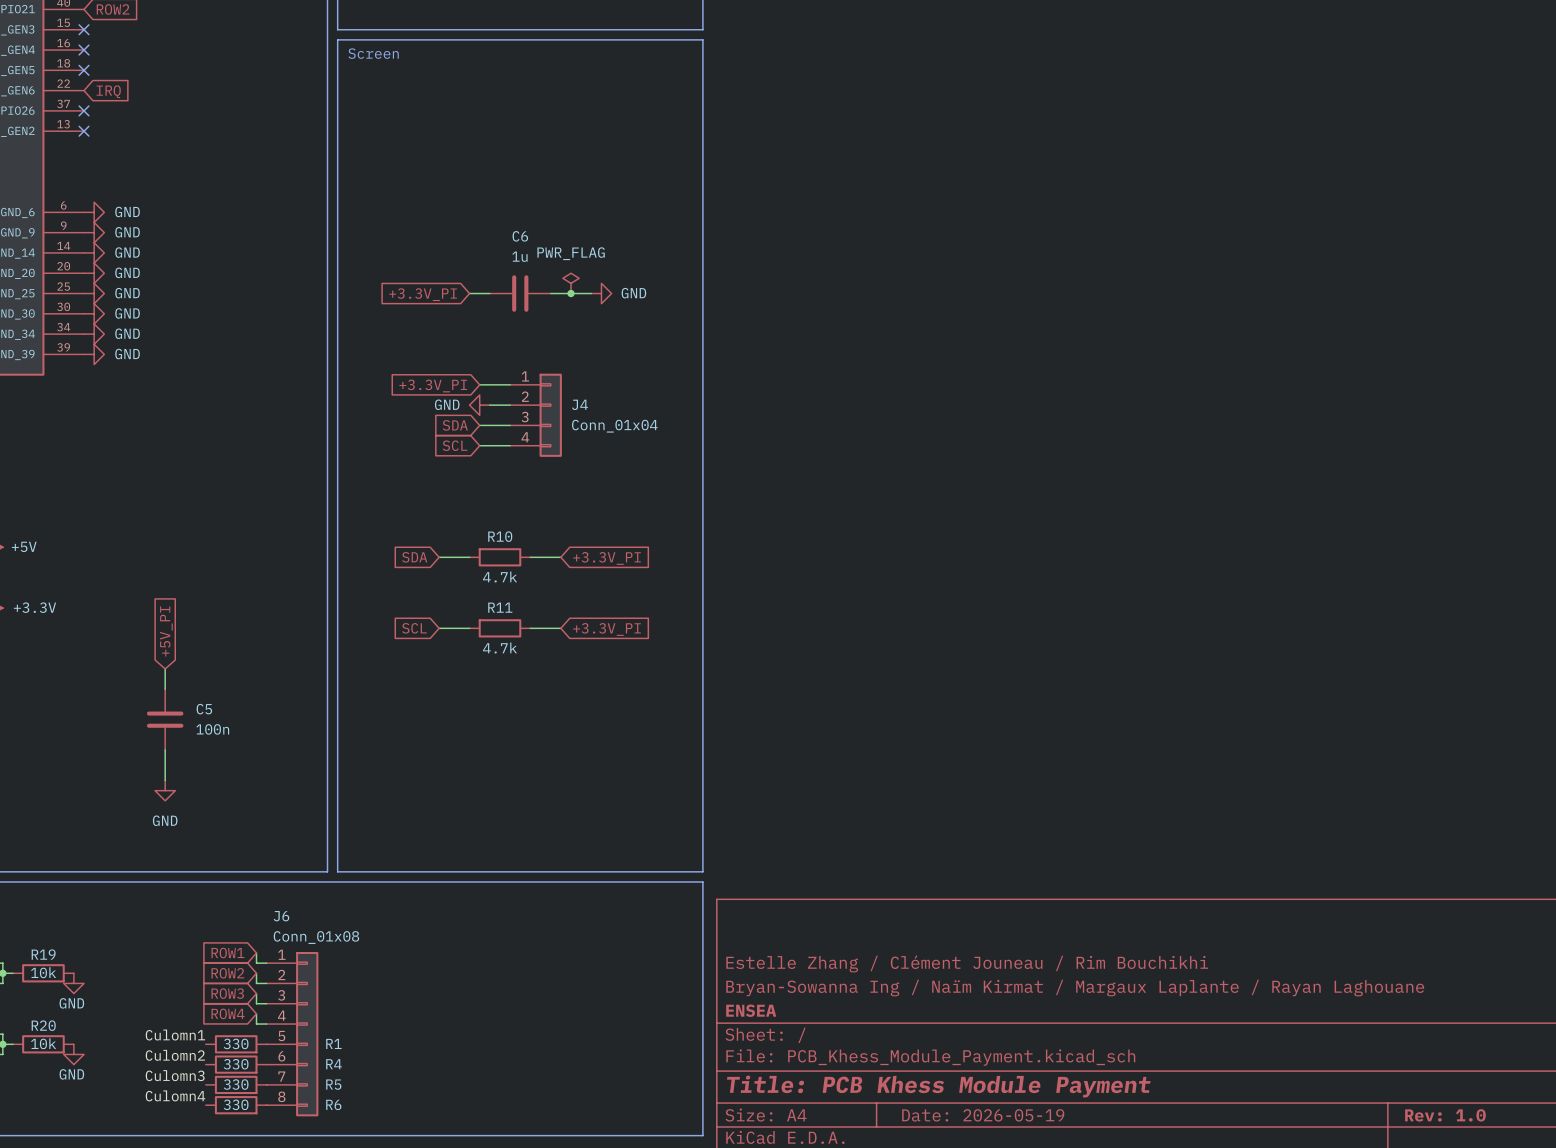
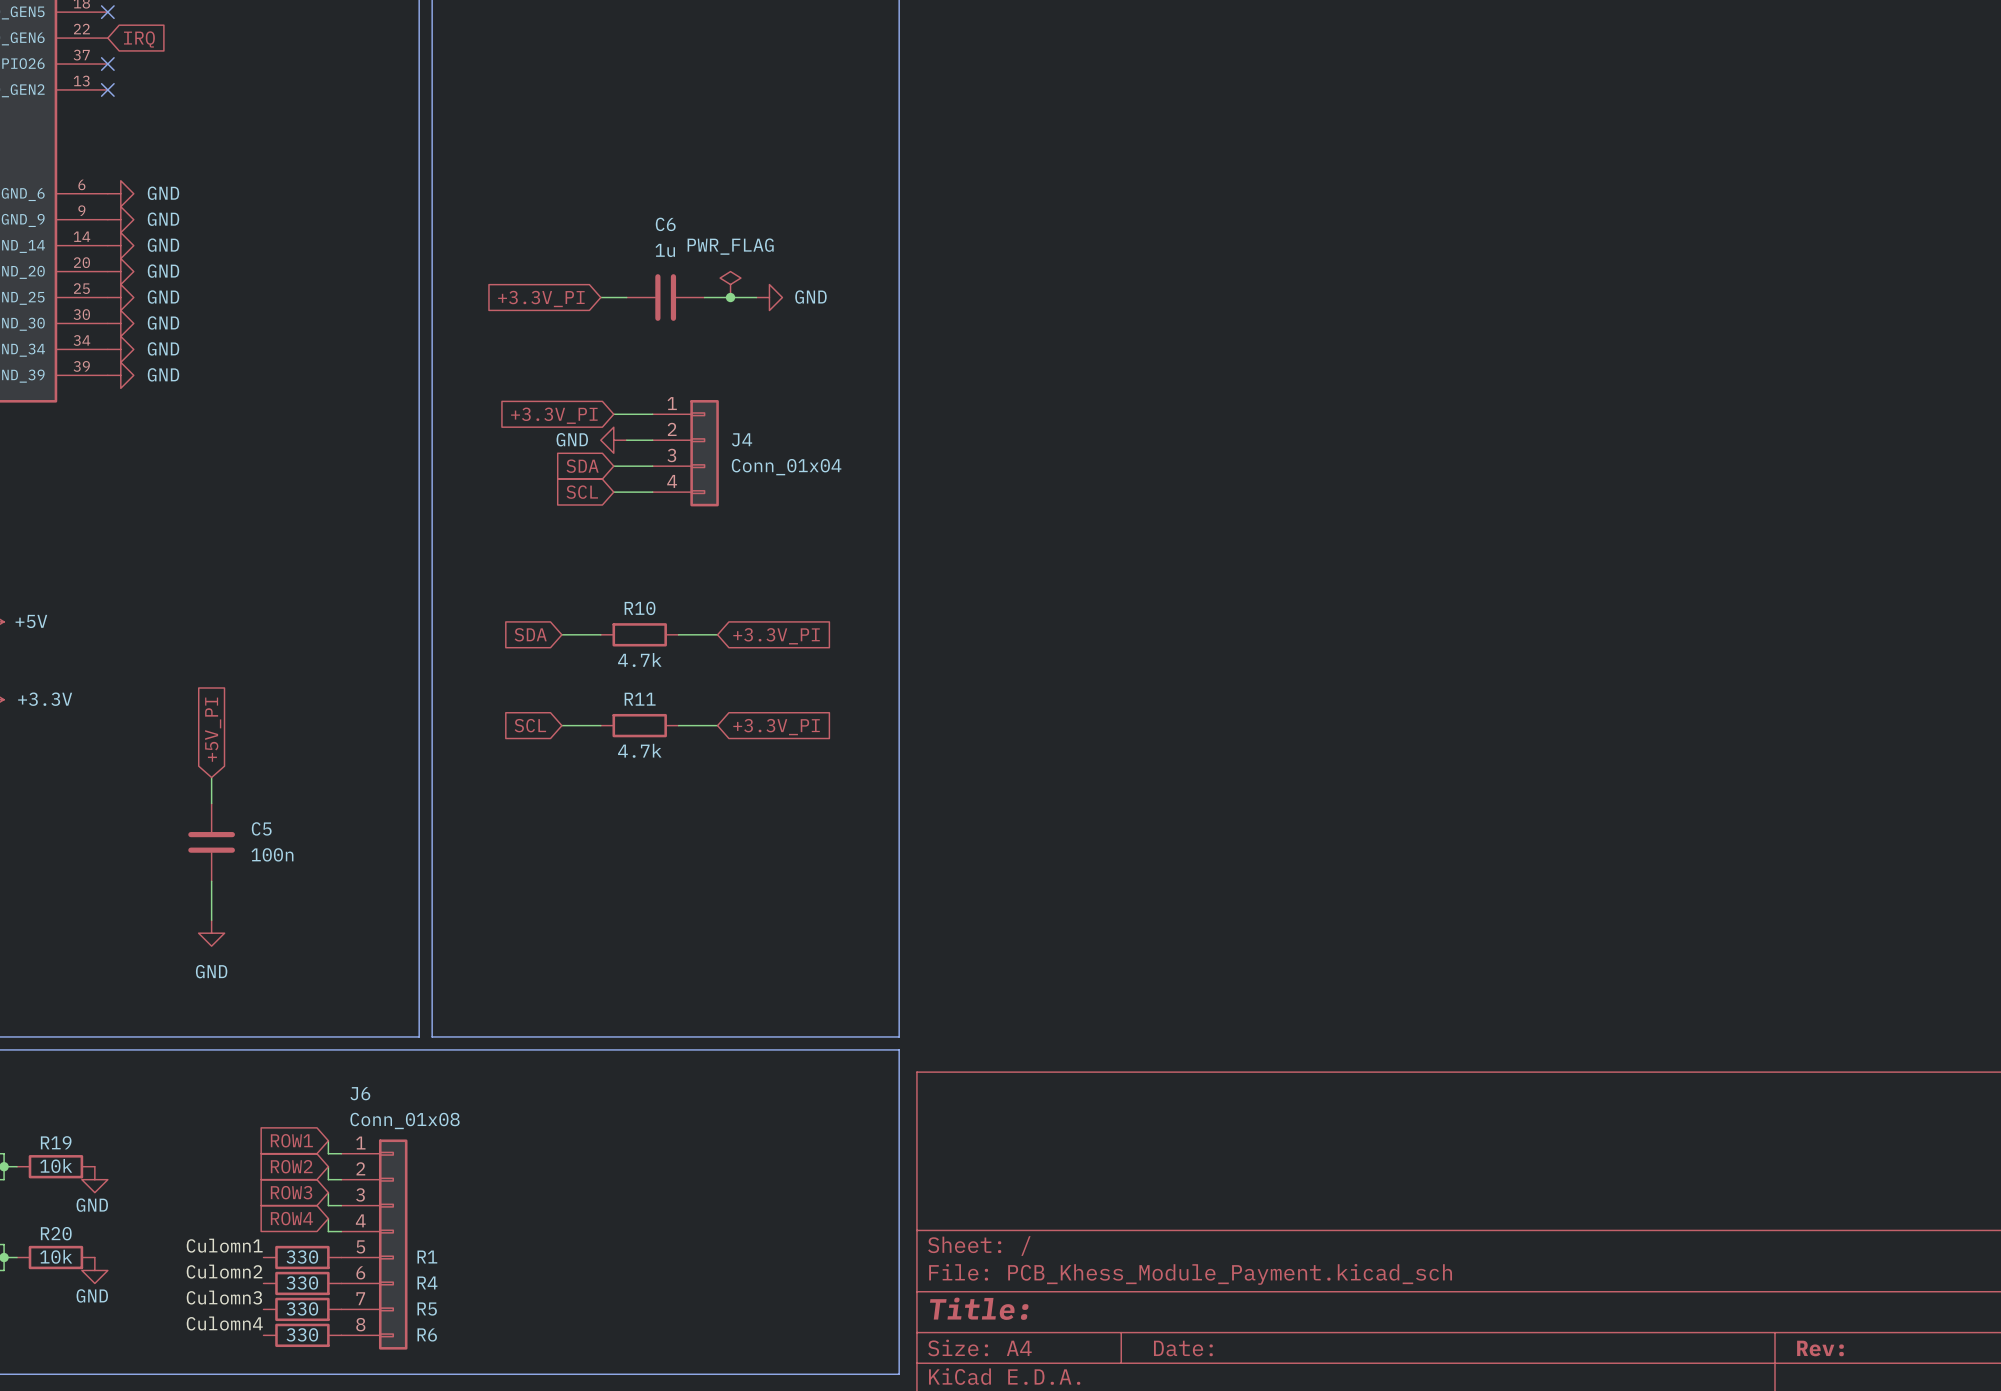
title block: Estelle Zhang / Clément Jouneau / Rim Bouchikhi (967, 963) -> none
title block: Bryan-Sowanna Ing / Naïm Kirmat / Margaux Laplante / Rayan Laghouane (1075, 988) -> none
title block: ENSEA (751, 1010) -> none
title block: Title: PCB Khess Module Payment (938, 1086) -> Title: (979, 1308)
title block: Date: 2026-05-19 (983, 1115) -> Date: (1183, 1348)
title block: Rev: 1.0 (1445, 1115) -> Rev: (1820, 1348)

